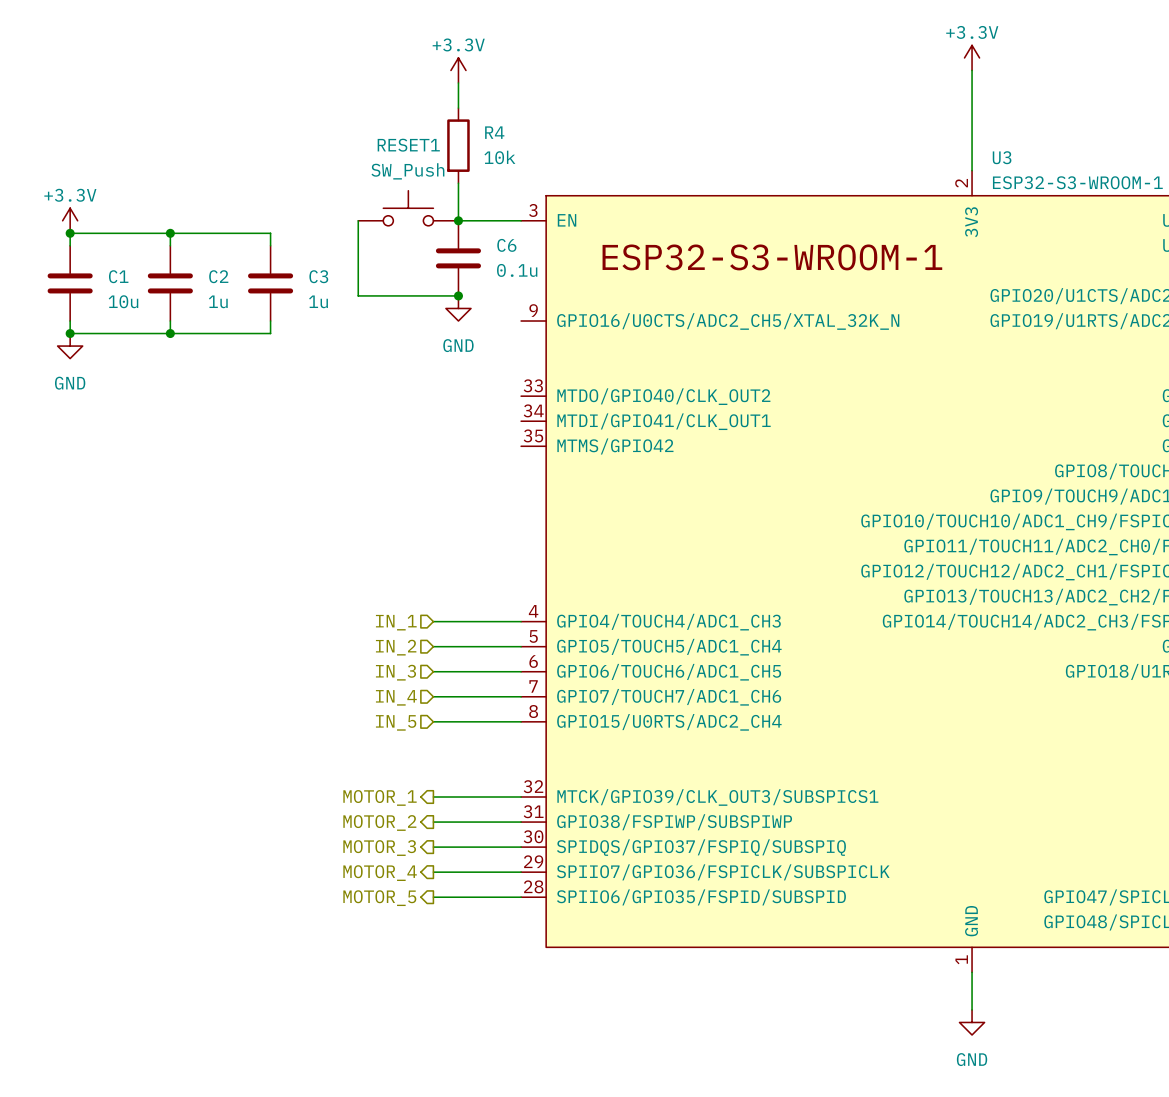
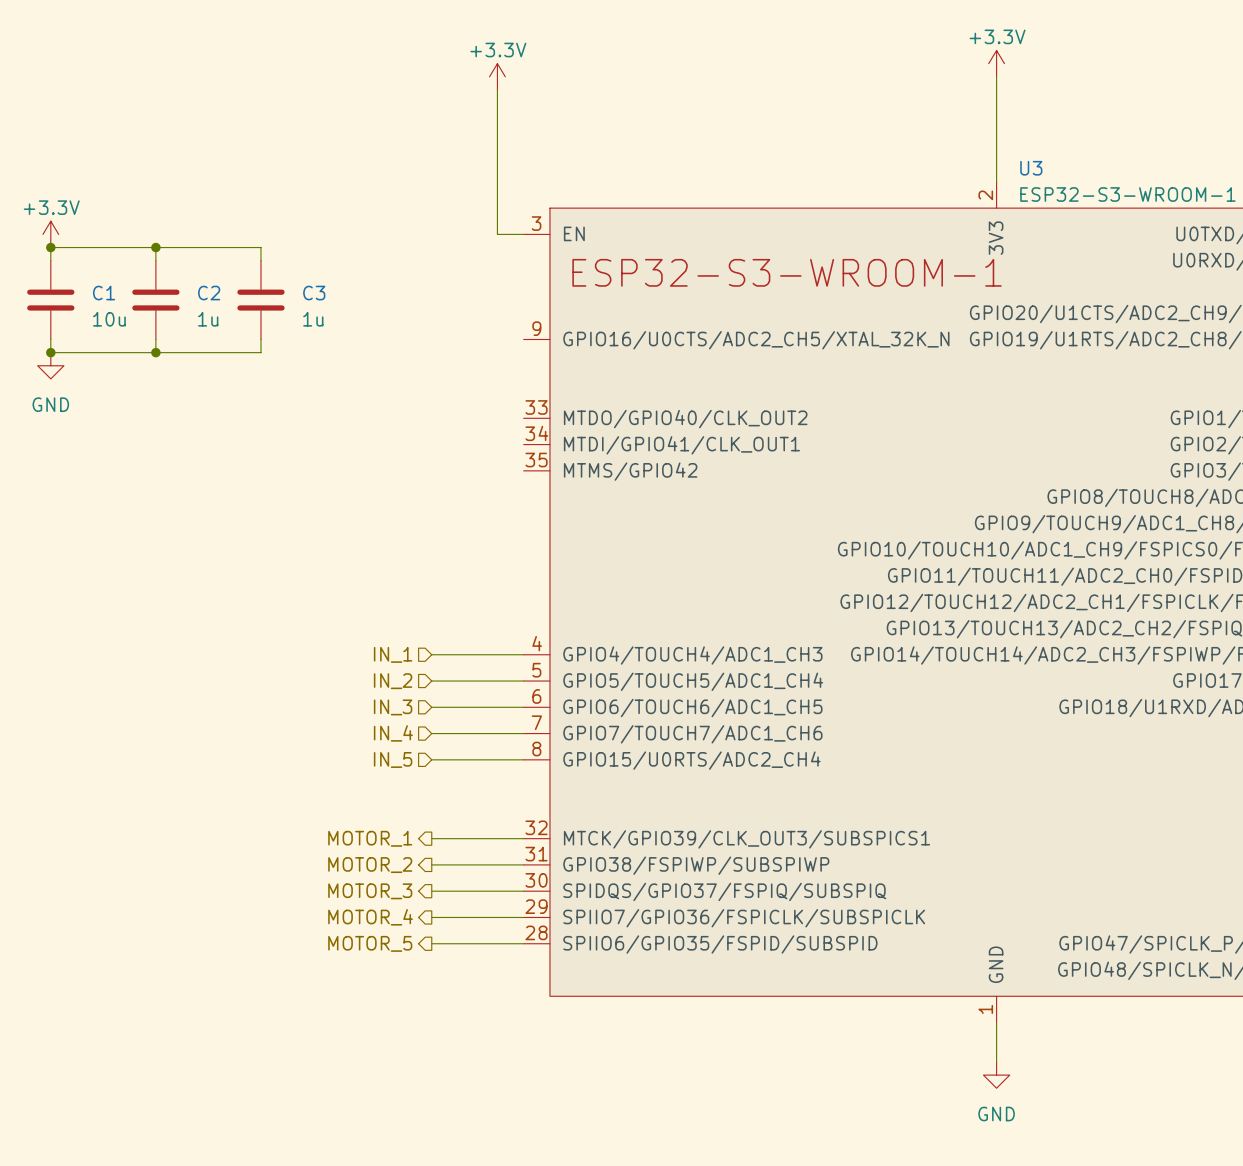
power symbol position: +3.3V (458, 70) -> +3.3V (497, 76)
wire: (458, 83) (458, 108) -> none
R4: 10k (458, 145) -> none
wire: (458, 183) (458, 220) (496, 220) -> (497, 89) (497, 234)
RESET1: SW_Push (408, 208) -> none
wire: (358, 220) (358, 295) (458, 295) -> none
junction: (458, 220) -> none
C6: 0.1u (458, 258) -> none
junction: (458, 295) -> none
power symbol: GND (458, 308) -> none

